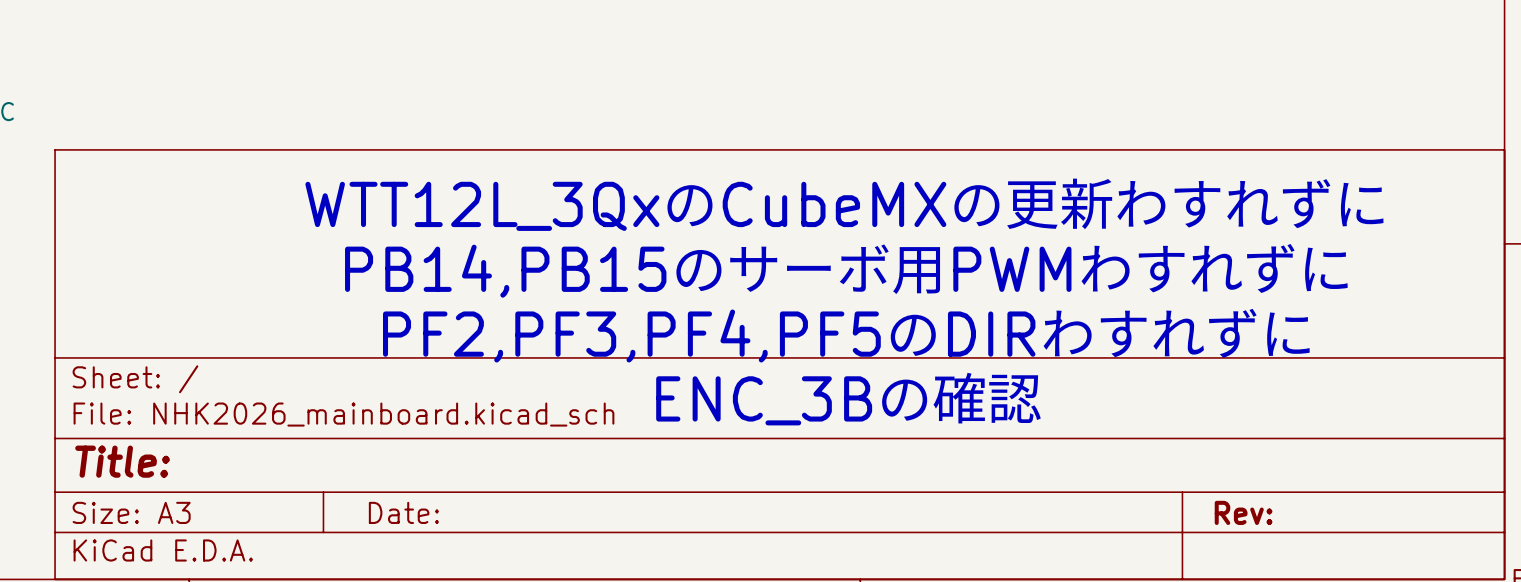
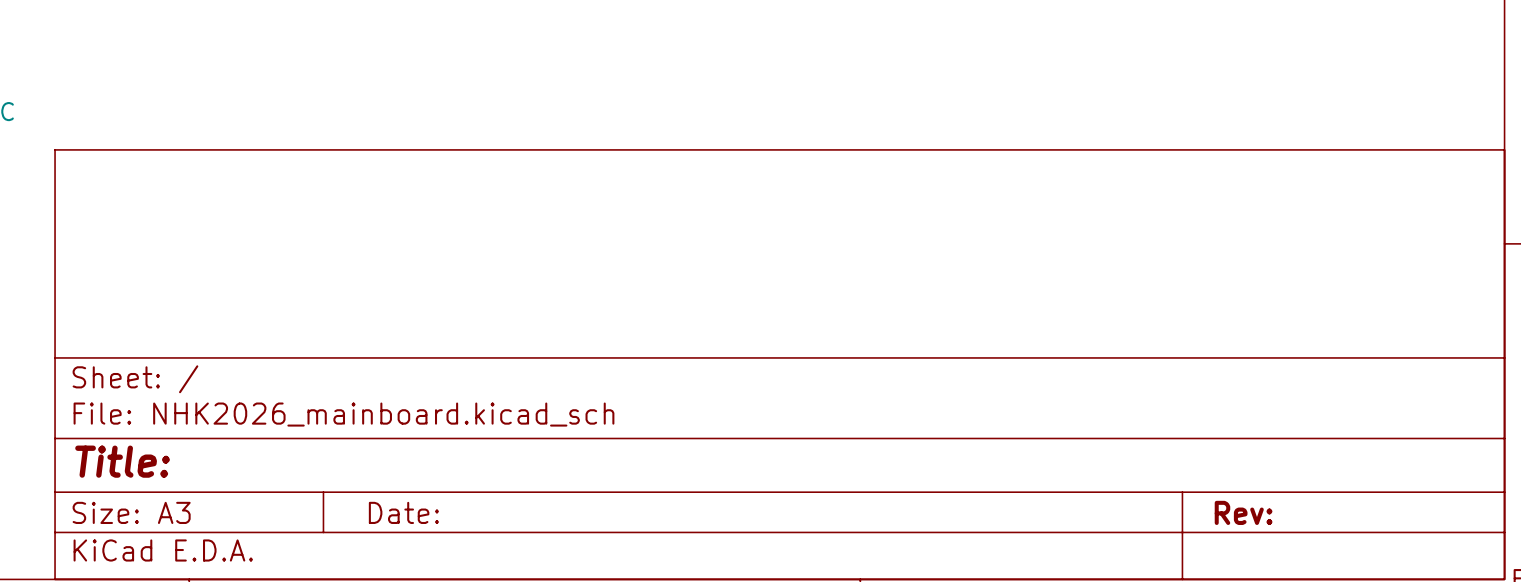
text: WTT12L_3QxのCubeMXの更新わすれずに (845, 203) -> none
text: PB14,PB15のサーボ用PWMわすれずに (847, 269) -> none
text: PF2,PF3,PF4,PF5のDIRわすれずに (847, 334) -> none
text: ENC_3Bの確認 (849, 398) -> none

